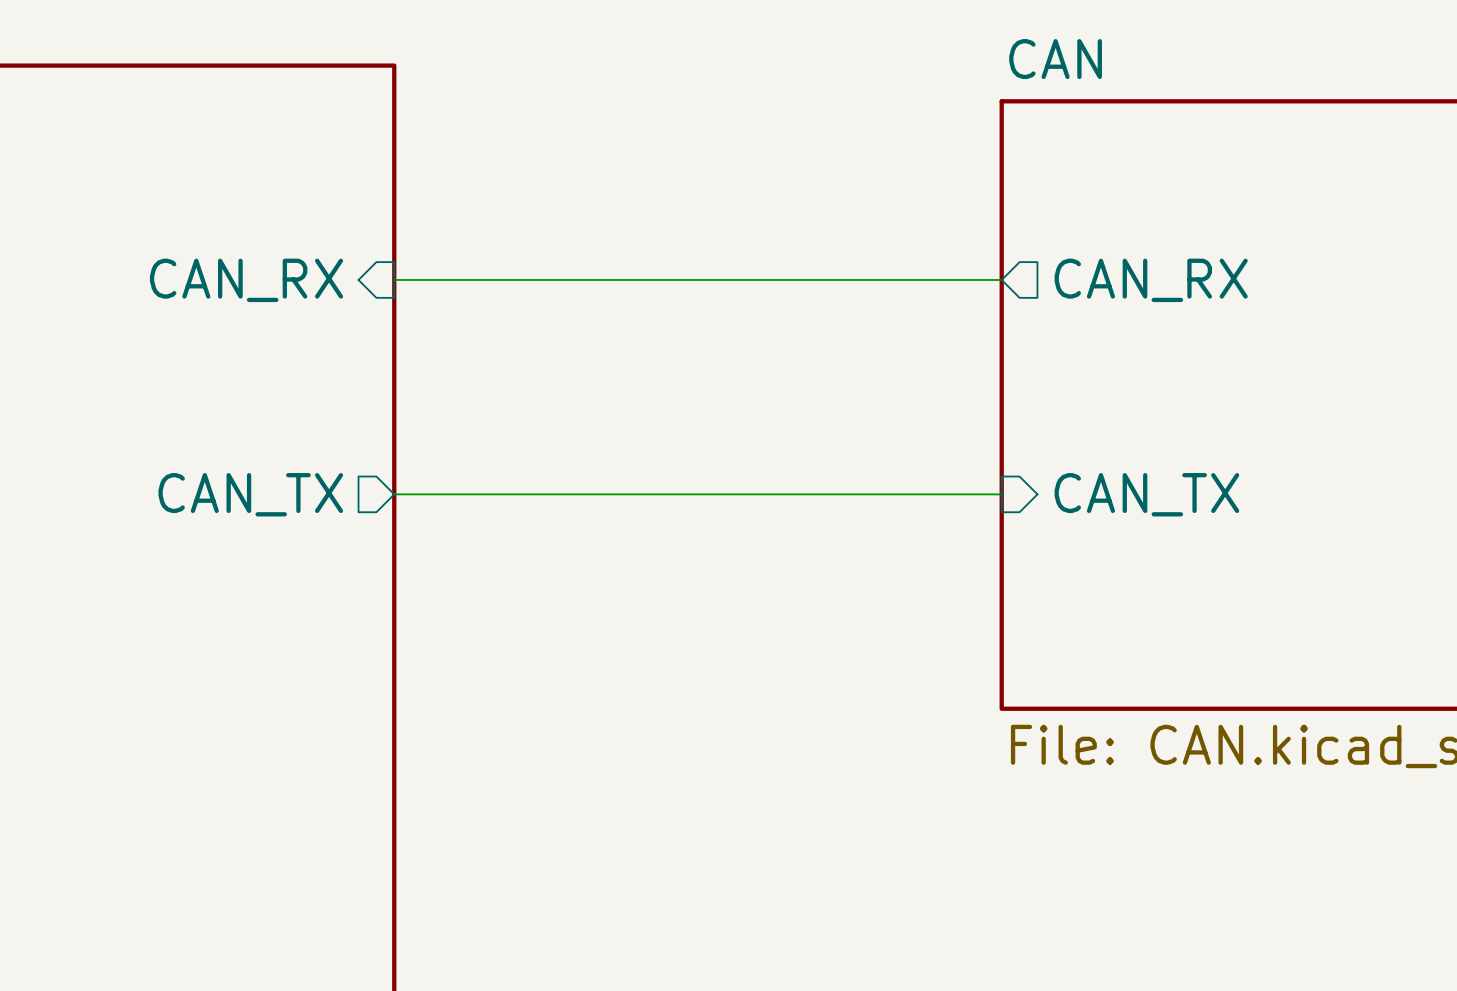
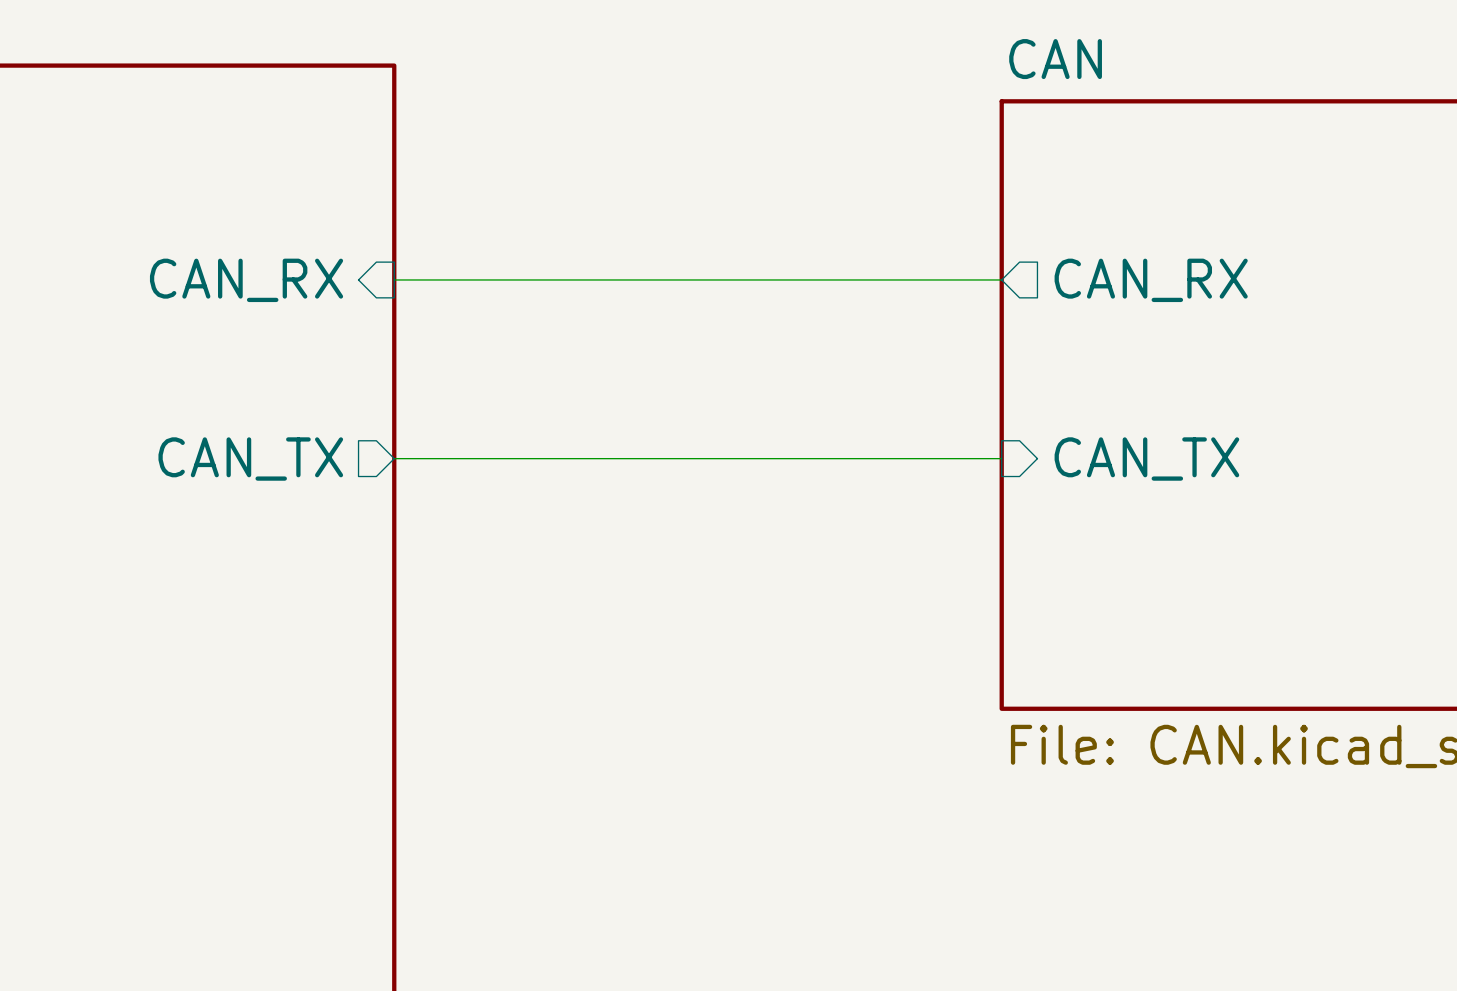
sheet pin position: CAN_TX (250, 494) -> CAN_TX (250, 459)
wire: (394, 494) (1001, 494) -> (394, 458) (1001, 458)
sheet pin position: CAN_TX (1146, 494) -> CAN_TX (1146, 459)

